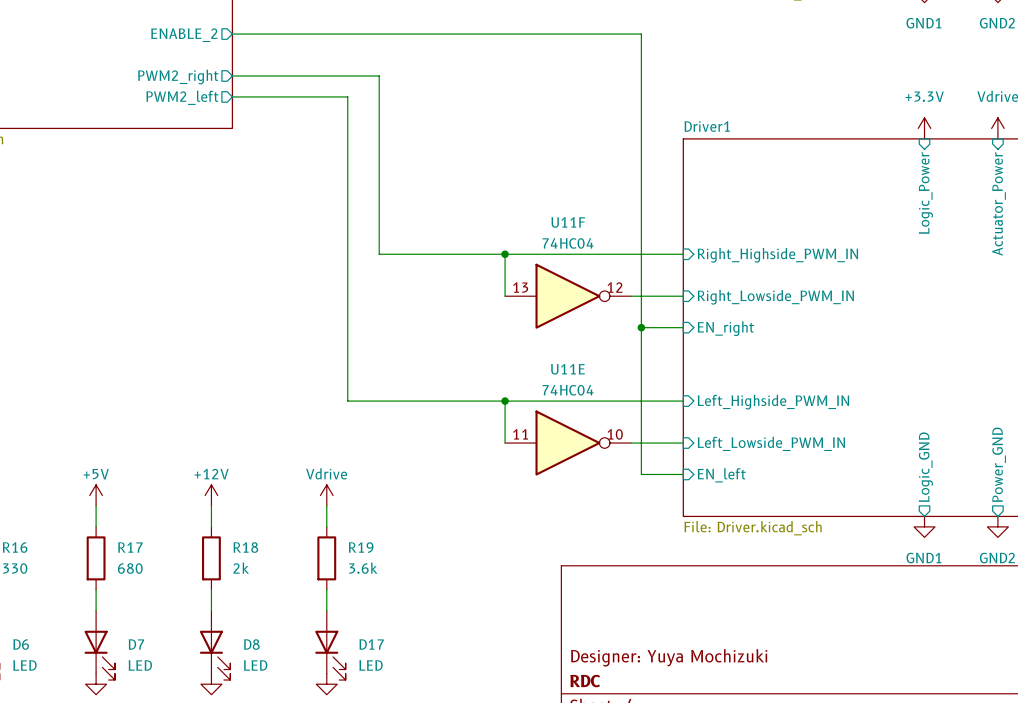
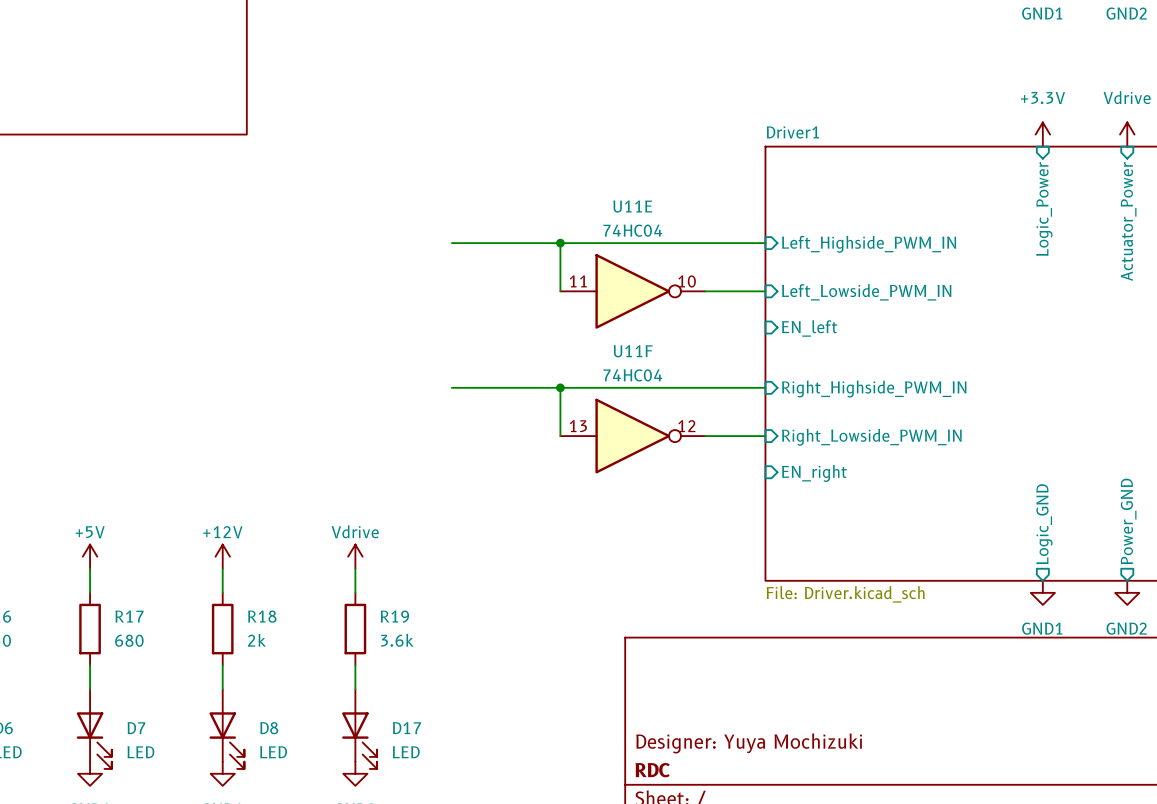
wire: (232, 34) (641, 34) (641, 474) (683, 474) -> none
sheet pin: ENABLE_2 (184, 35) -> none
wire: (232, 75) (379, 75) (379, 254) (683, 254) -> none
sheet pin: PWM2_right (178, 77) -> none
wire: (232, 96) (347, 96) (347, 401) (683, 401) -> none
sheet pin: PWM2_left (182, 97) -> none
wire: none -> (451, 243) (765, 243)
junction position: (505, 254) -> (560, 243)
sheet pin position: Right_Highside_PWM_IN (777, 255) -> Right_Highside_PWM_IN (874, 389)
wire: (505, 264) (505, 296) -> (560, 243) (560, 279)
U11F position: (567, 296) -> (632, 436)
wire: (630, 296) (683, 296) -> (705, 291) (765, 291)
sheet pin: Right_Lowside_PWM_IN (775, 297) -> EN_left (809, 328)
wire: (641, 327) (683, 327) -> none
junction: (641, 327) -> none
sheet pin position: EN_right (725, 328) -> EN_right (814, 473)
wire: none -> (451, 387) (765, 387)
junction: none -> (560, 387)
sheet pin: none -> Right_Lowside_PWM_IN (871, 437)
wire: (505, 401) (505, 443) -> (560, 387) (560, 436)
junction: (505, 401) -> none
sheet pin position: Left_Highside_PWM_IN (773, 402) -> Left_Highside_PWM_IN (869, 244)
U11E position: (567, 443) -> (632, 291)
wire: (630, 443) (683, 443) -> (705, 436) (765, 436)
sheet pin position: Left_Lowside_PWM_IN (771, 443) -> Left_Lowside_PWM_IN (866, 292)
sheet pin: EN_left (721, 475) -> none

